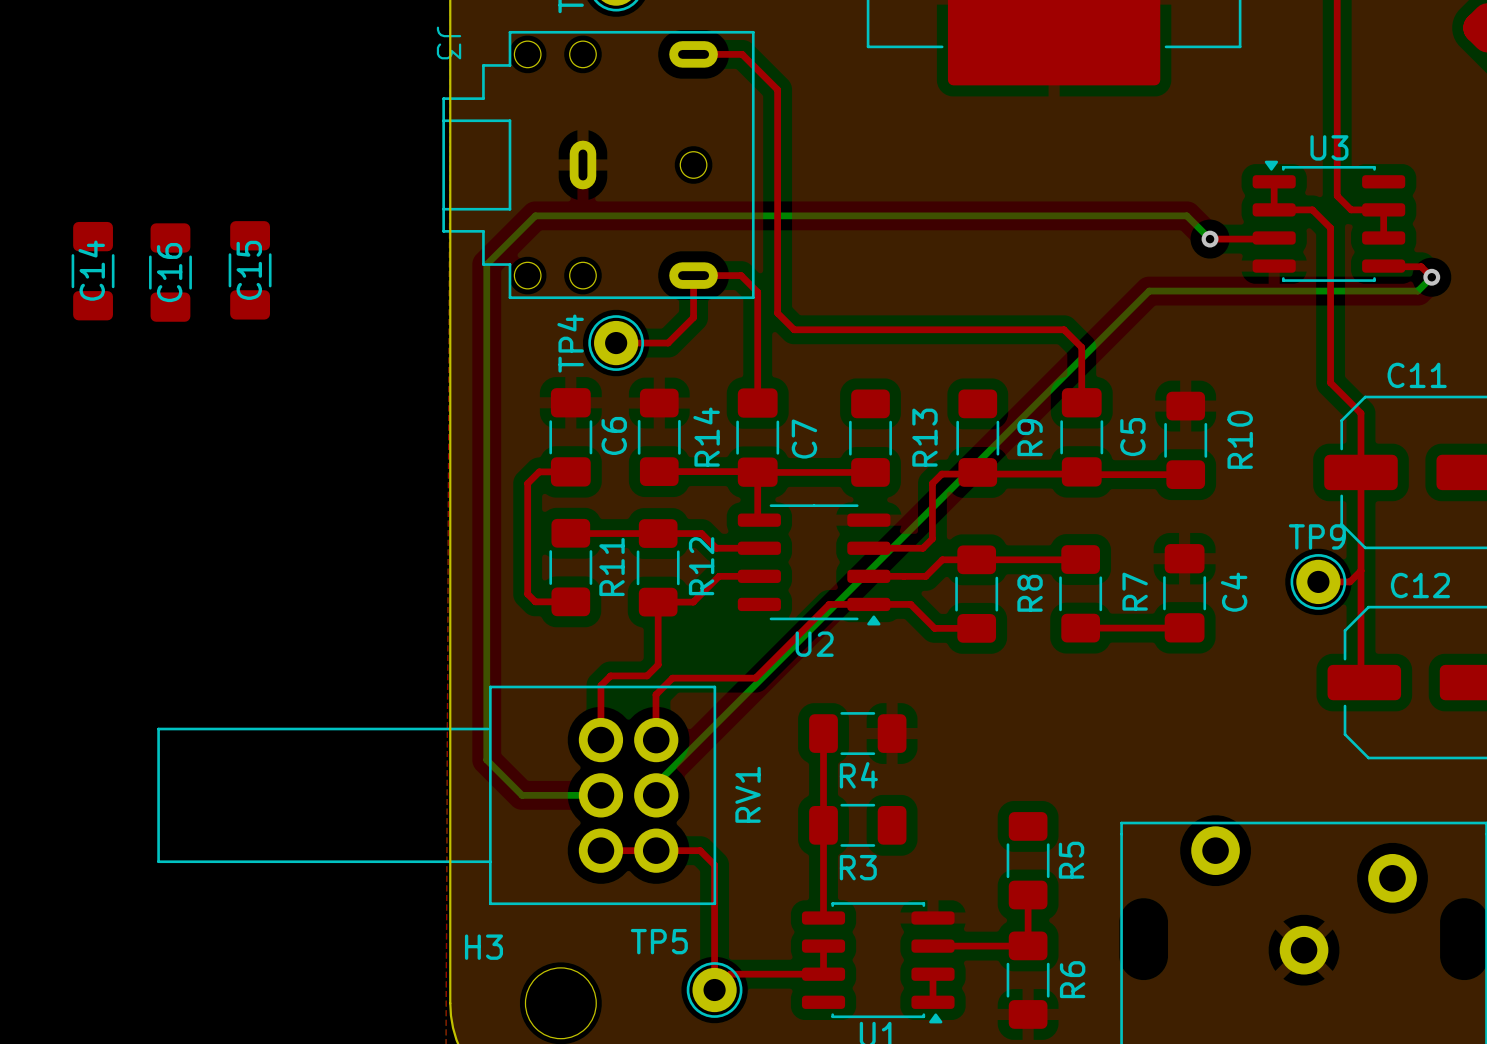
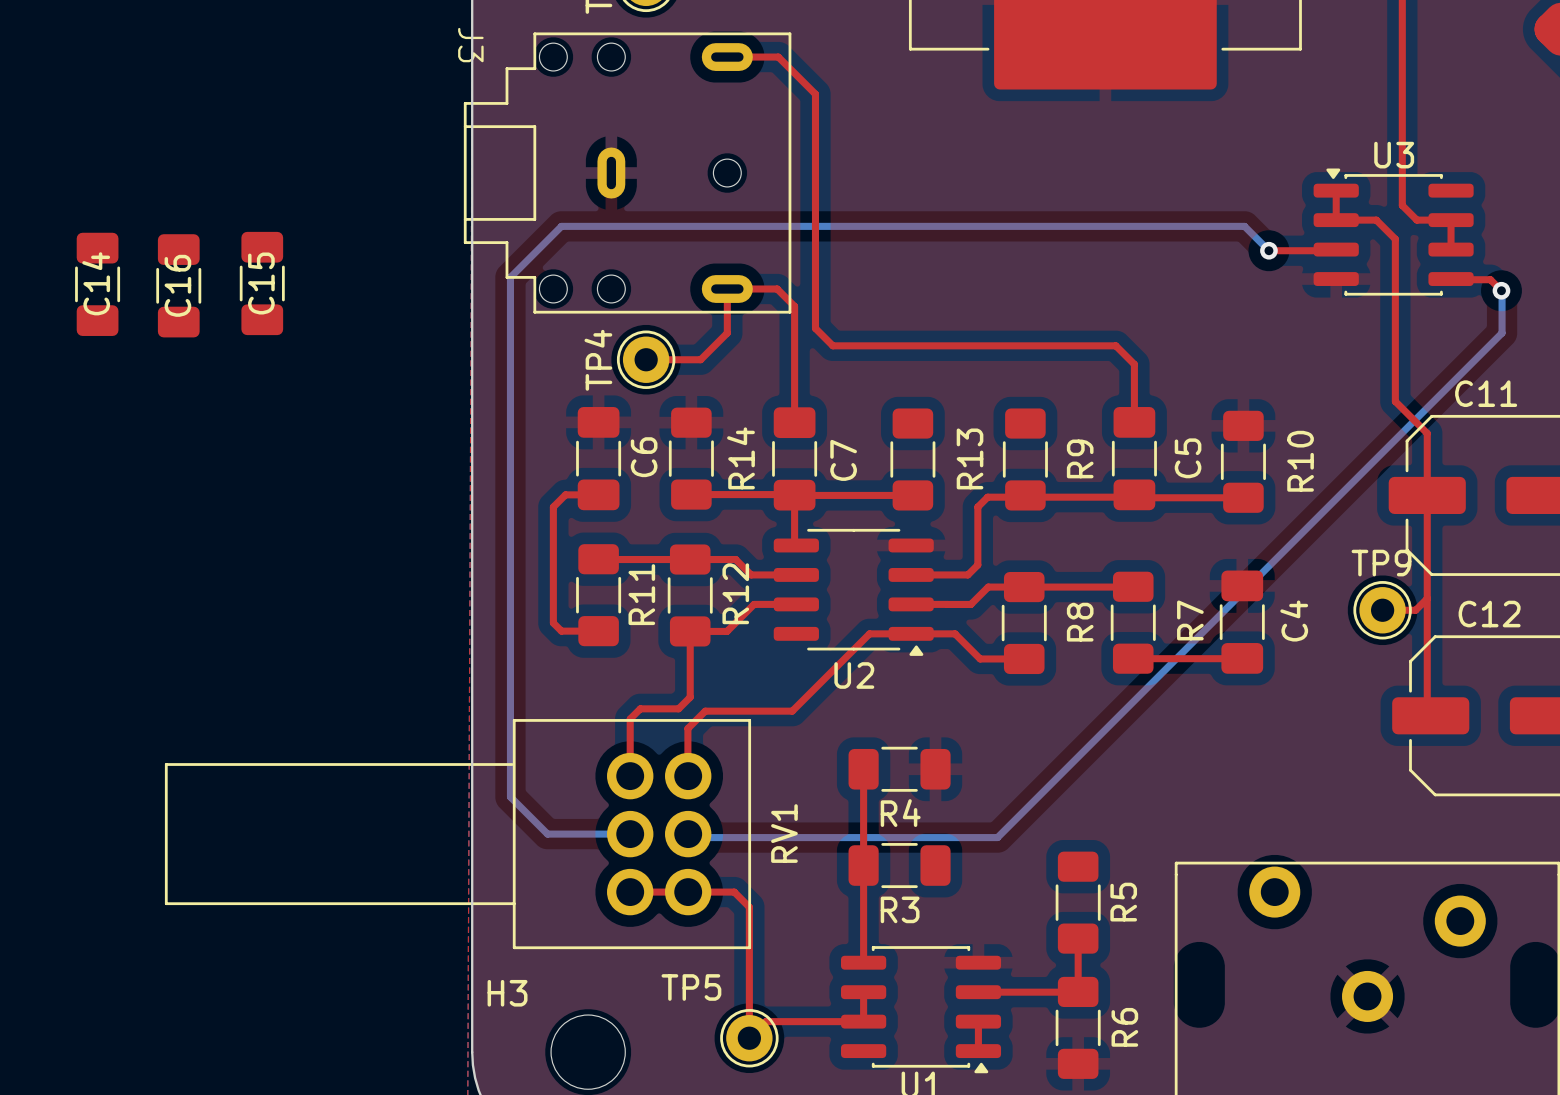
bottom track: (1431, 277) (1417, 291) (1149, 291) (656, 784) (656, 795) -> (1501, 290) (1502, 333) (997, 837) (691, 837) (688, 834)

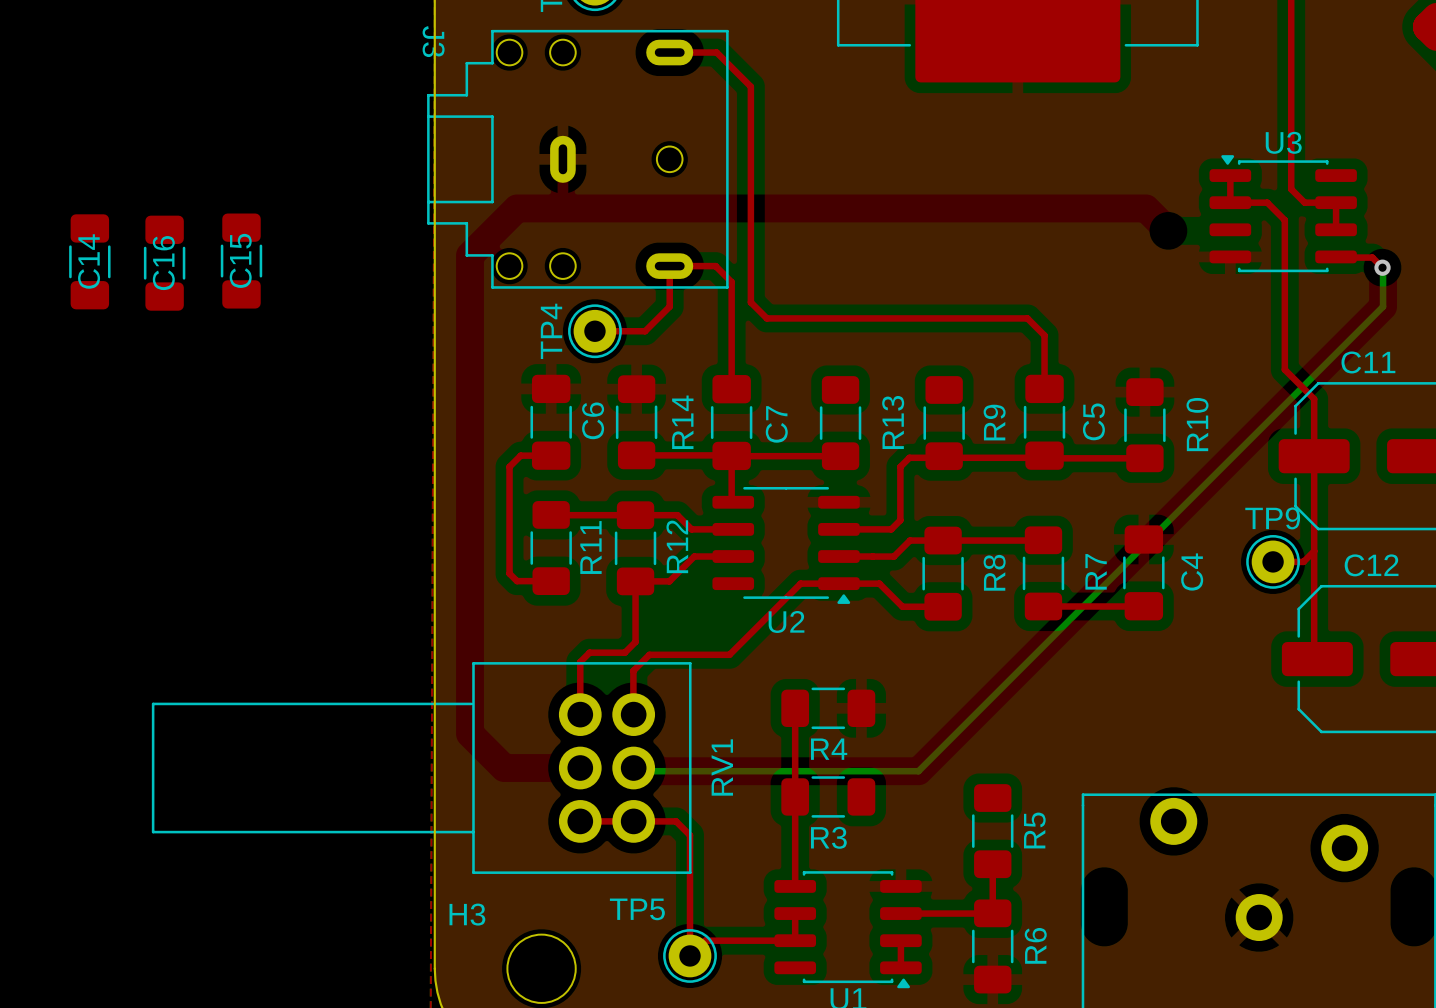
top track: (1268, 250) (1335, 250) -> none
bottom track: (1268, 250) (1244, 226) (561, 226) (510, 277) (510, 796) (547, 834) (630, 834) -> none
via: (1268, 250) -> none

